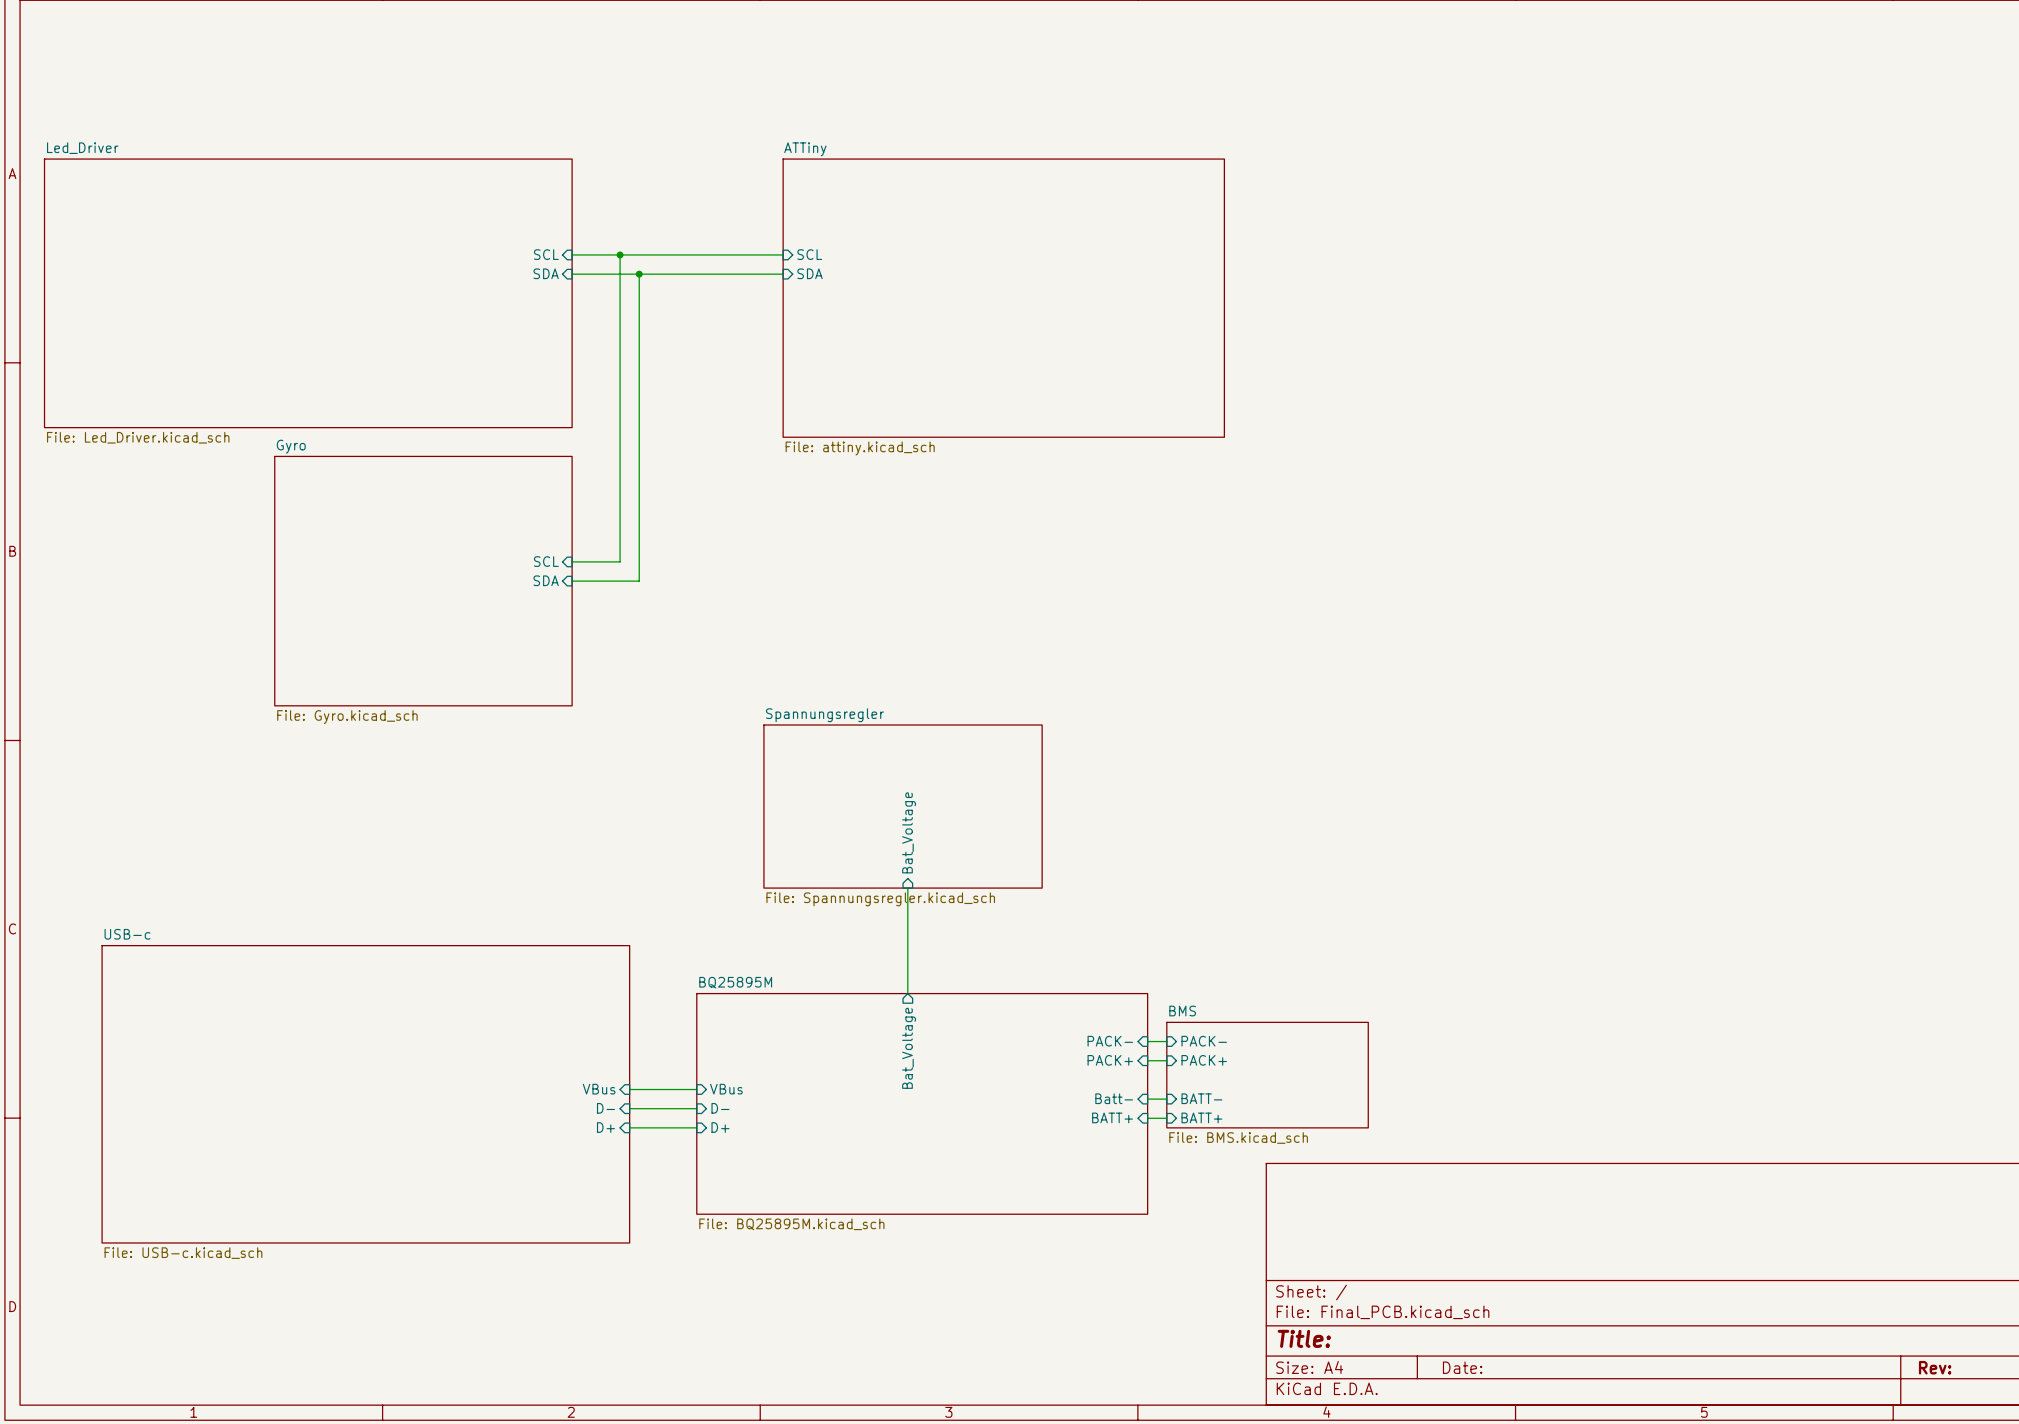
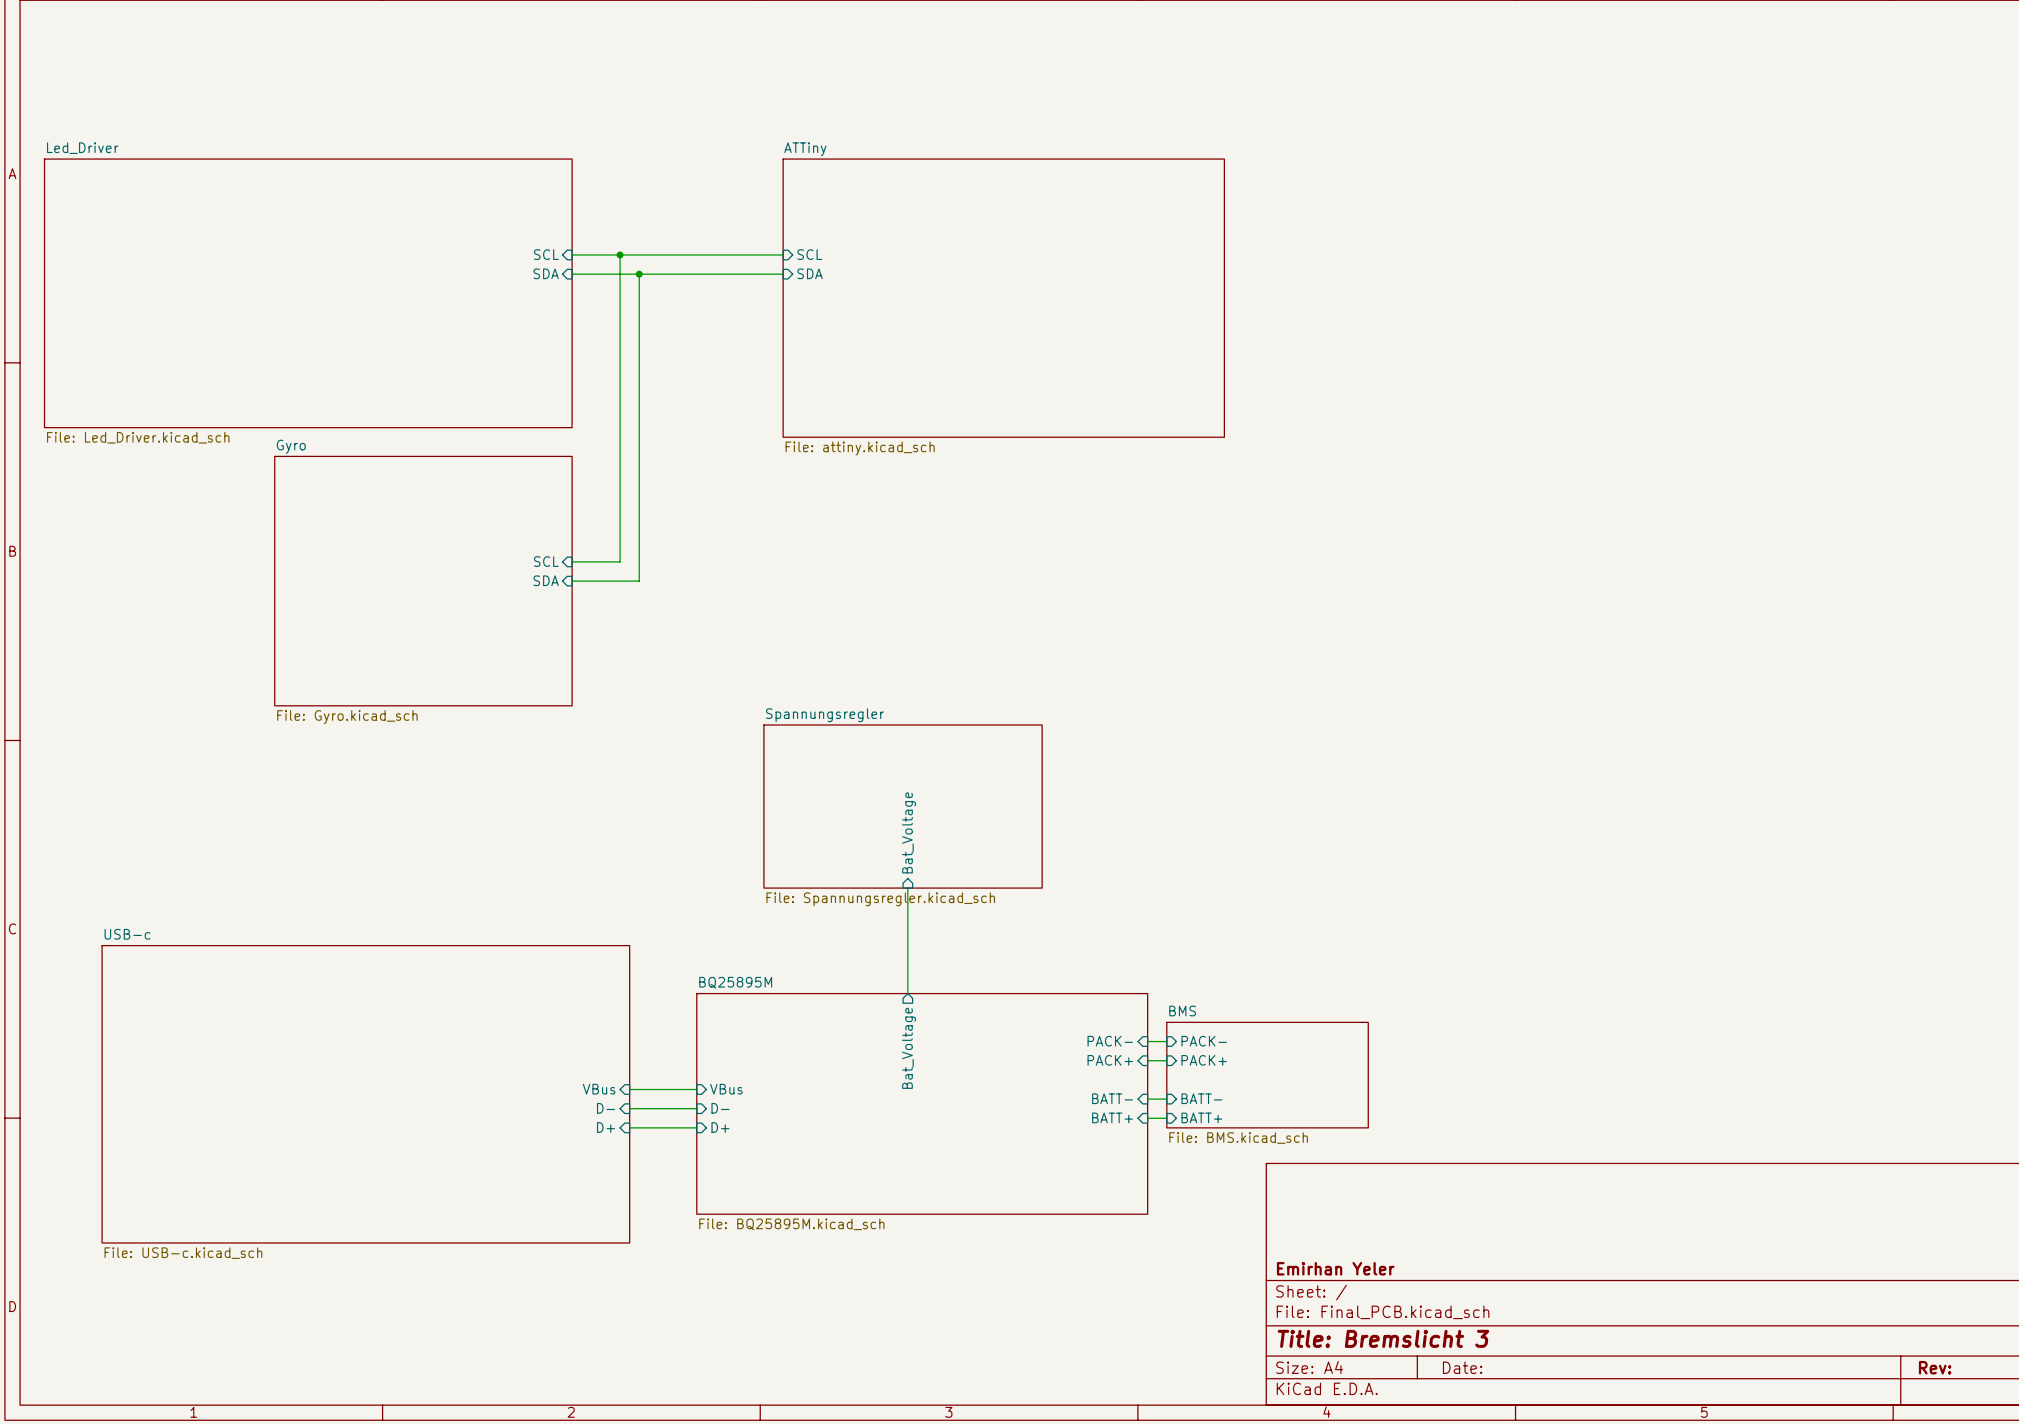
sheet pin: Batt- (1114, 1098) -> BATT- (1112, 1098)
title block: none -> Emirhan Yeler (1335, 1268)
title block: Title: (1304, 1338) -> Title: Bremslicht 3 (1383, 1338)

